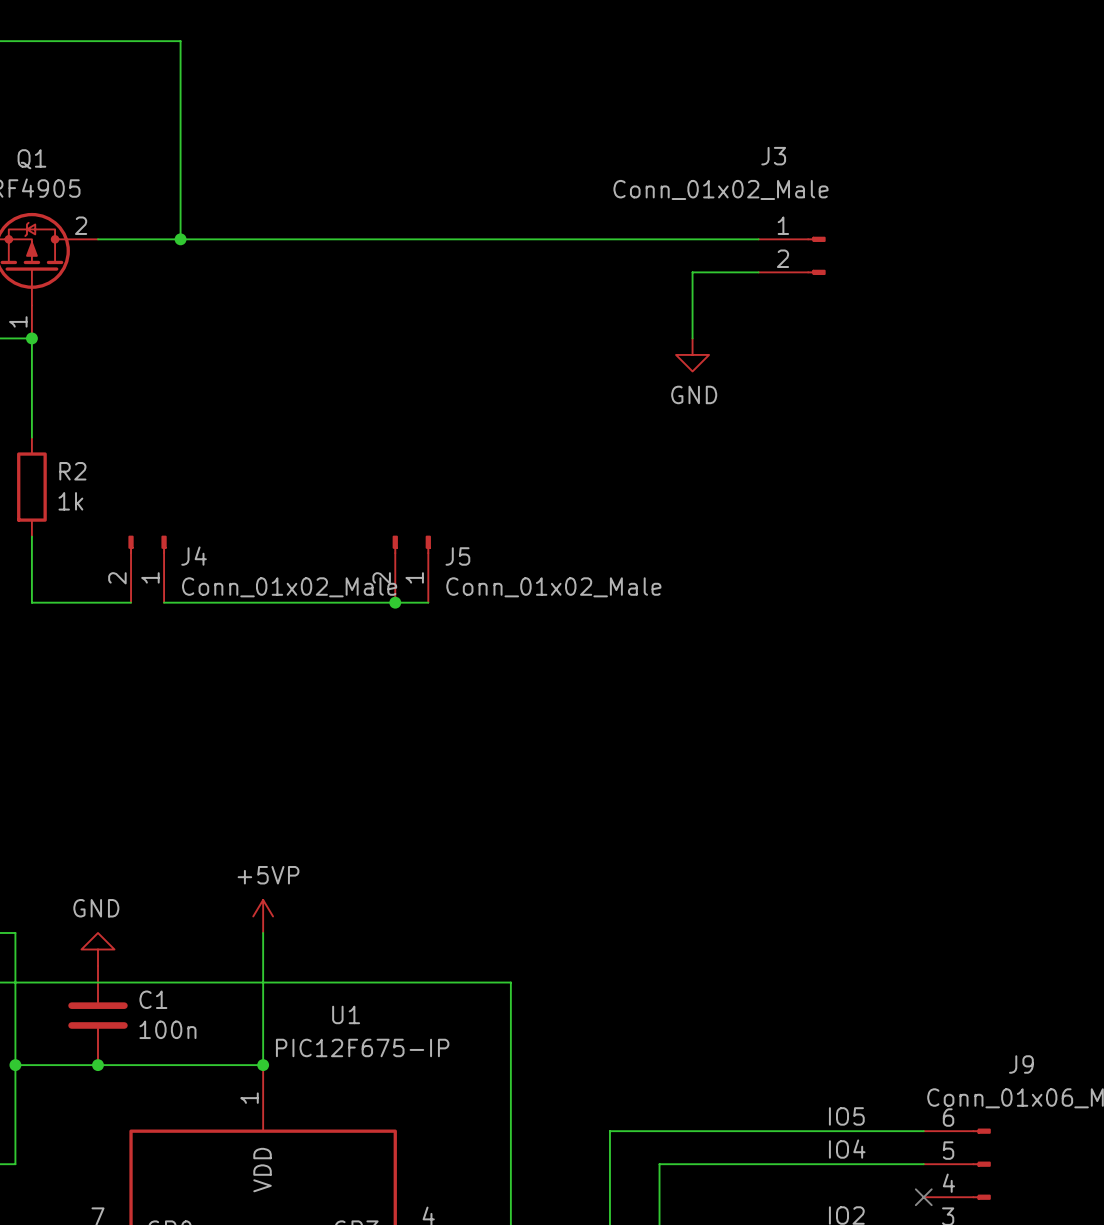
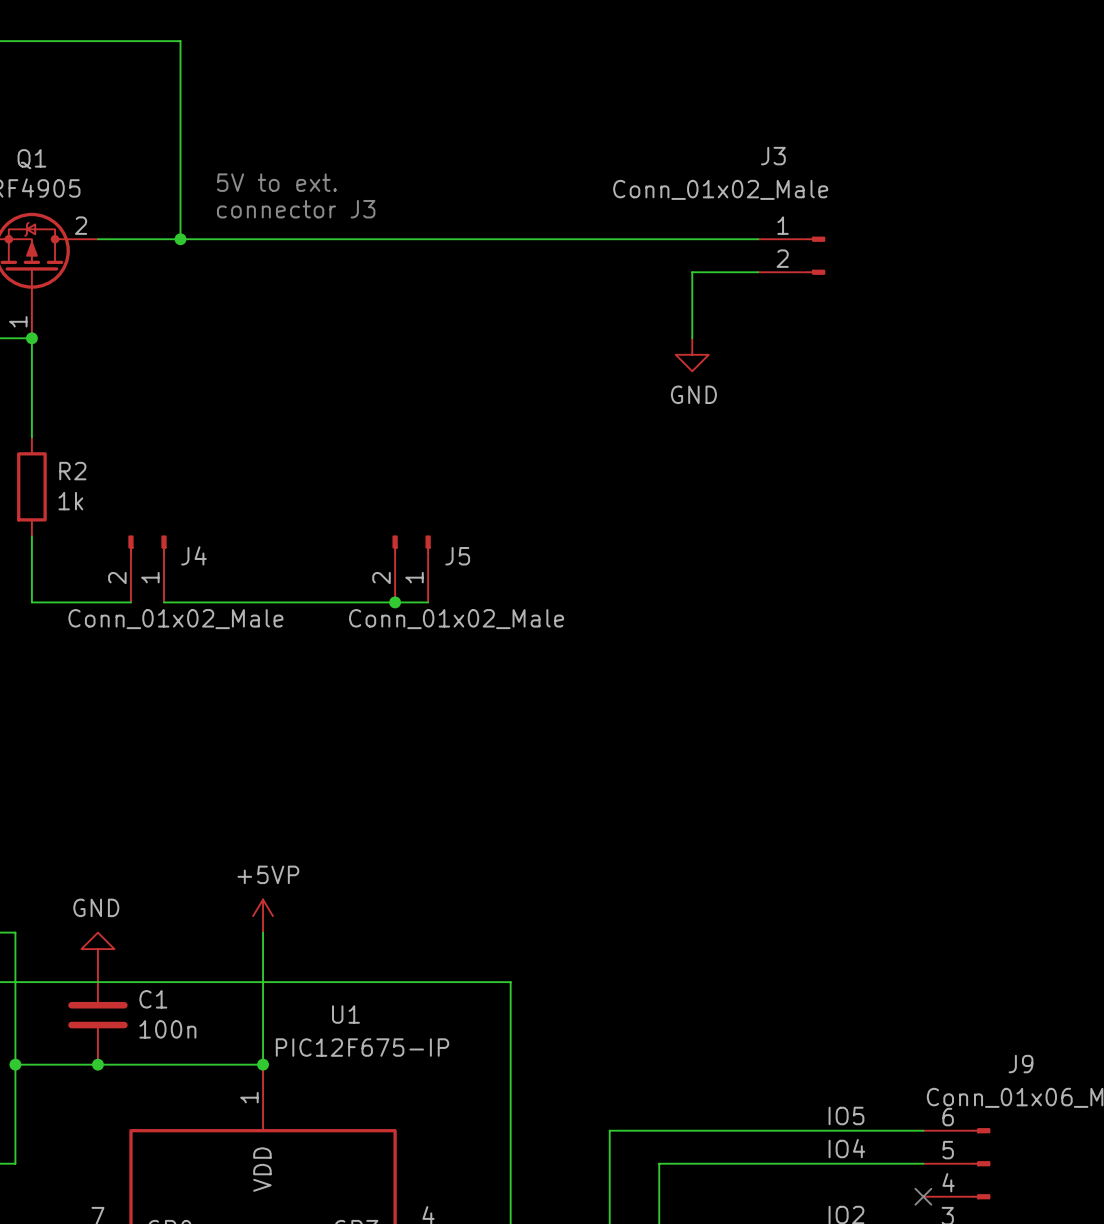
text: none -> 5V to ext. (276, 182)
text: none -> connector J3 (296, 209)
J4 value position: Conn_01x02_Male (289, 587) -> Conn_01x02_Male (175, 619)
J5 value position: Conn_01x02_Male (553, 587) -> Conn_01x02_Male (456, 619)

